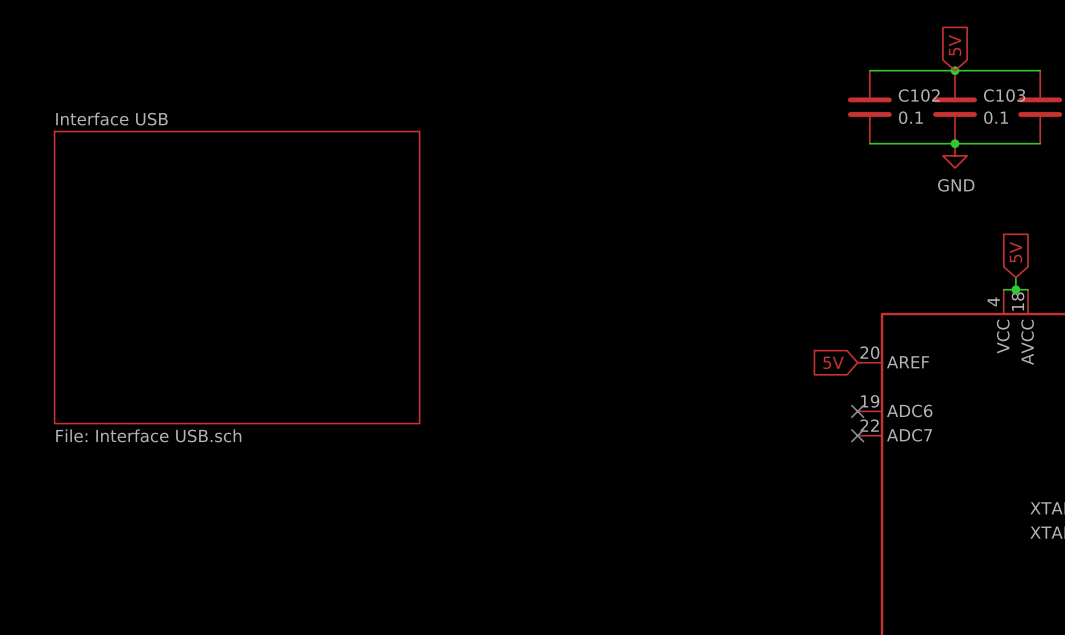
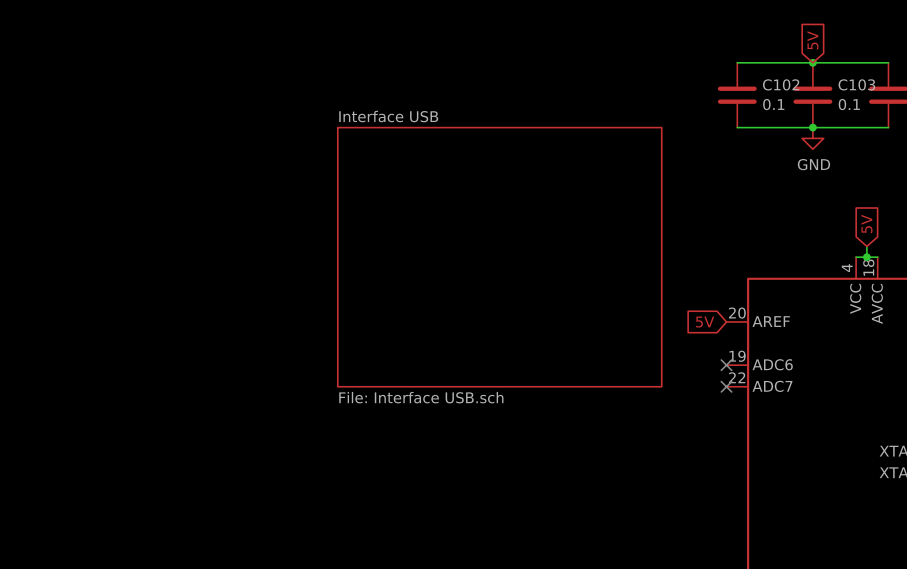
sheet Interface USB: File: Interface USB.sch (237, 277) -> none
sheet Interface USB: none -> File: Interface USB.sch (499, 257)

